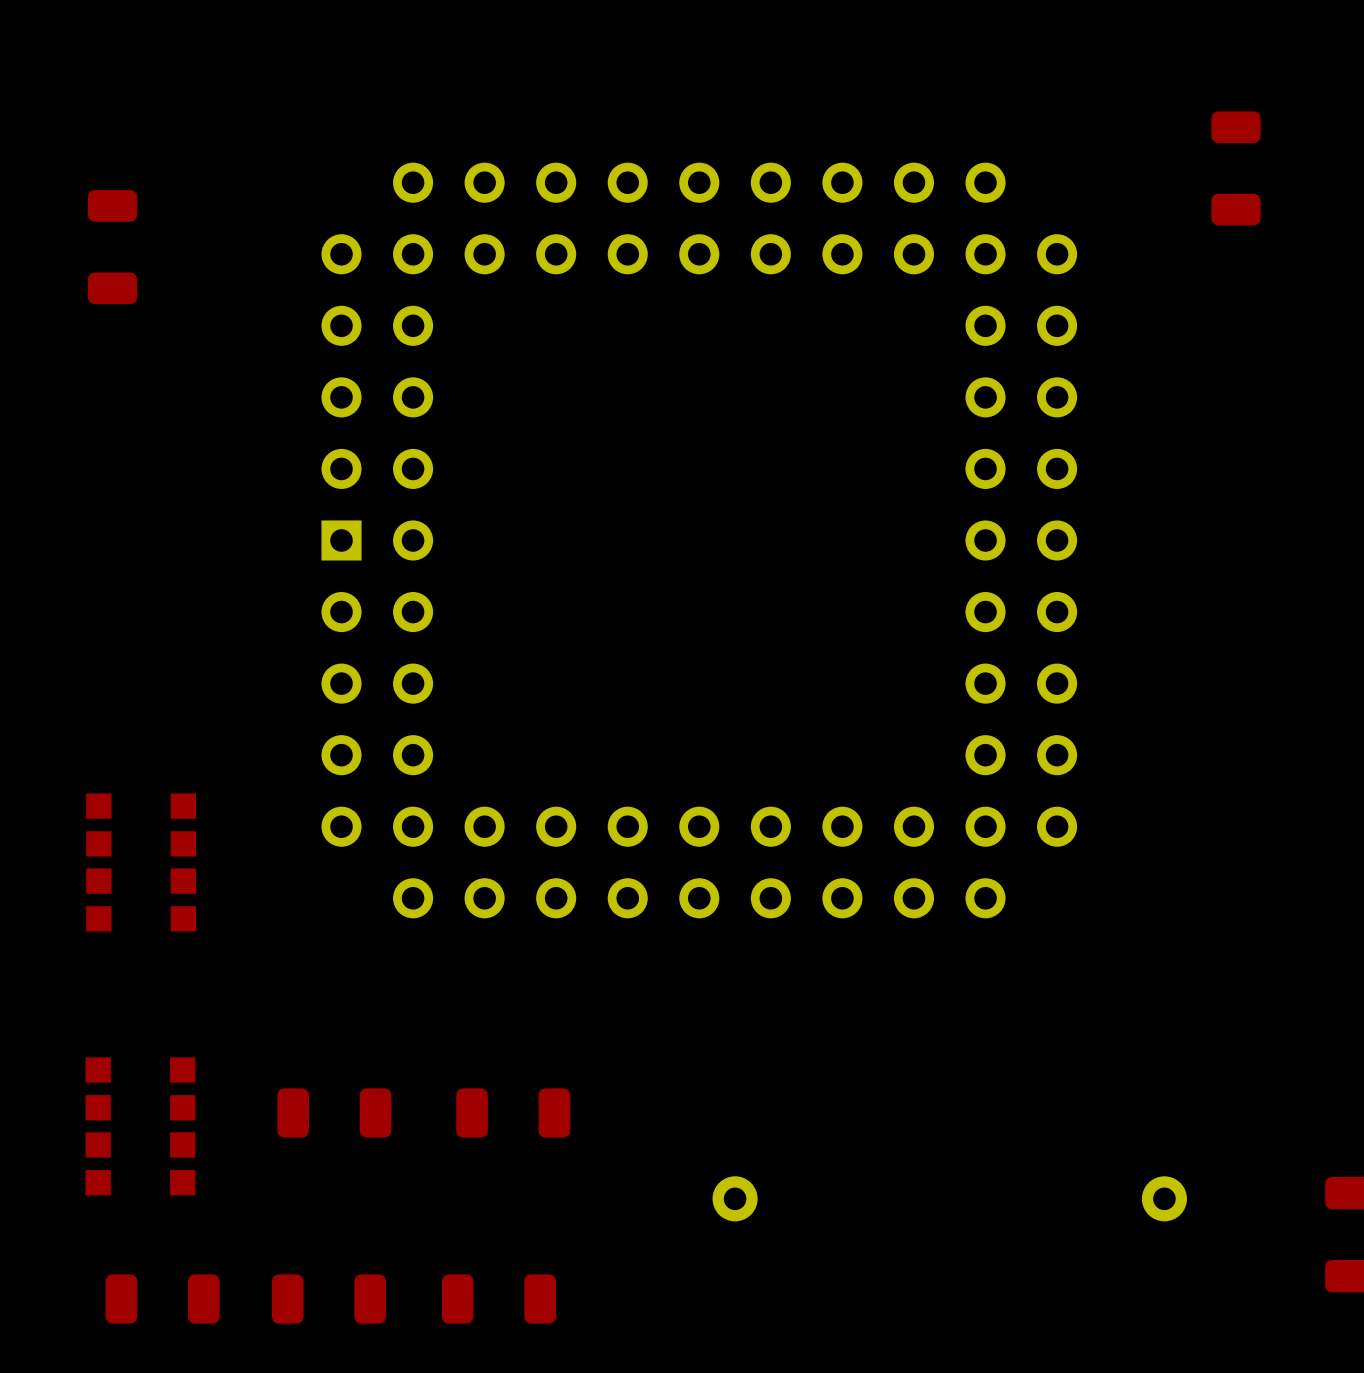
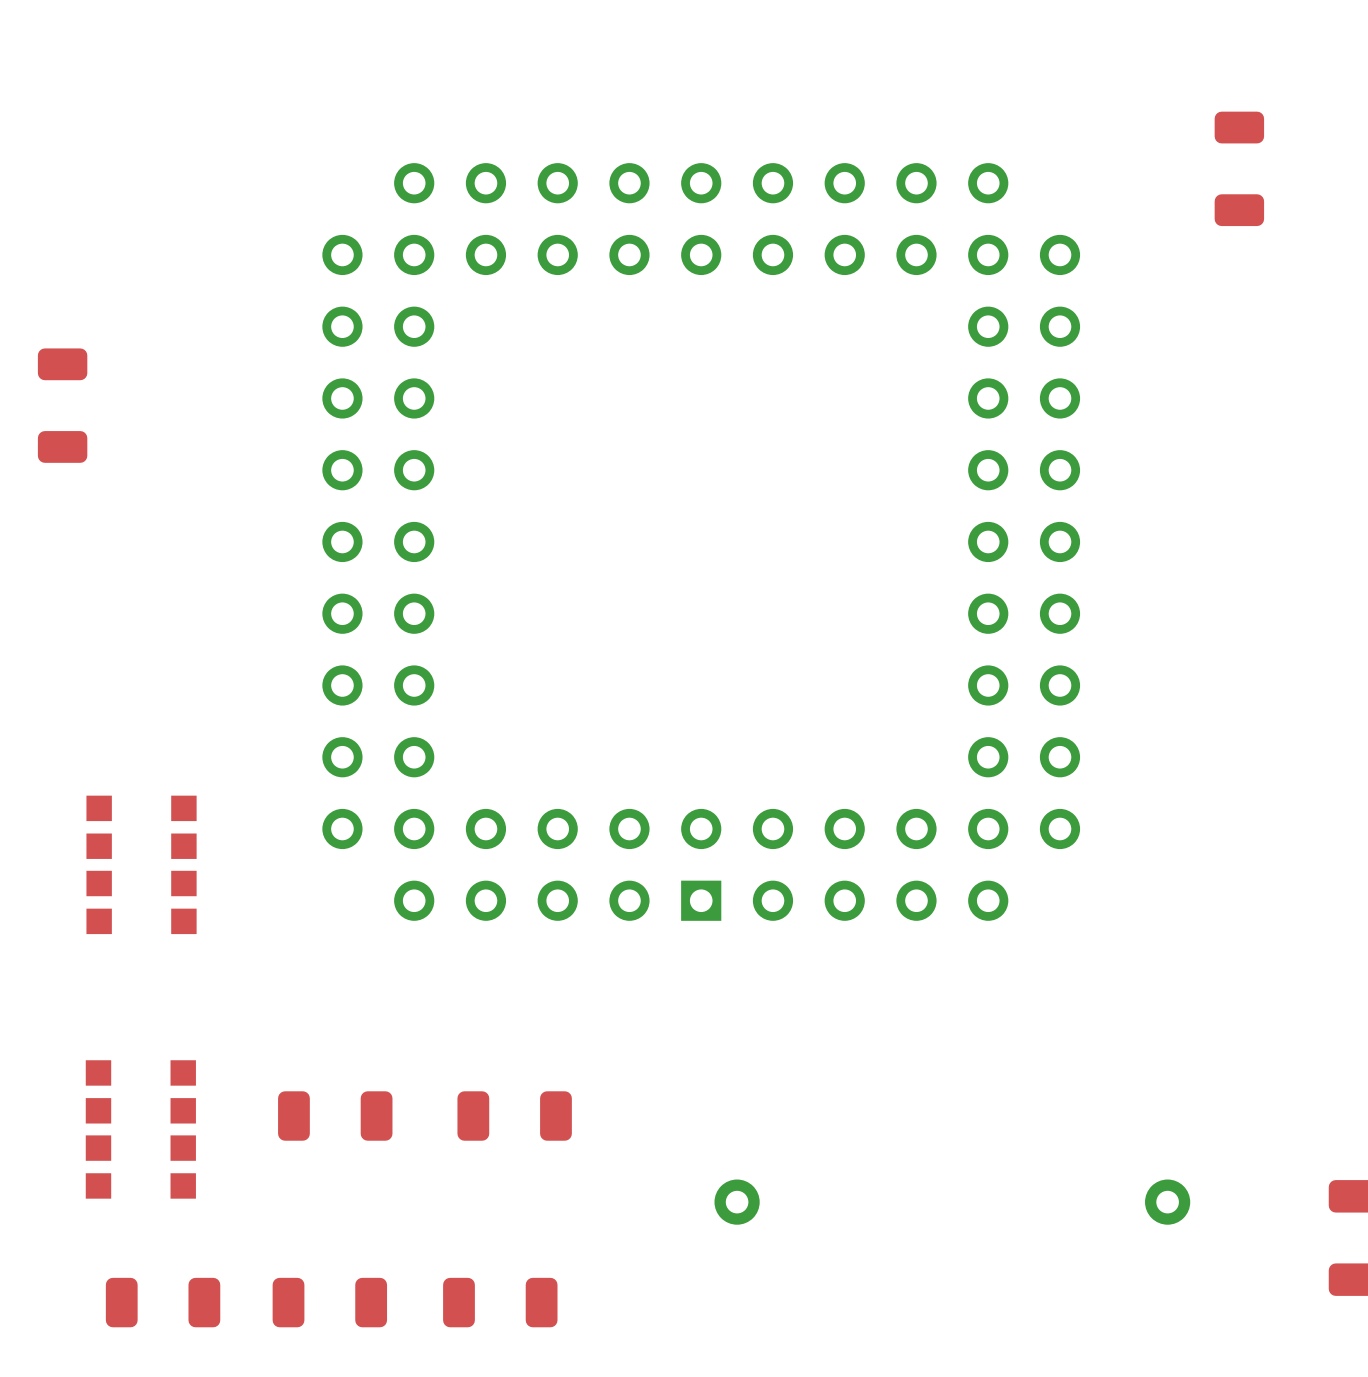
part position: (112, 247) -> (62, 405)
part rotation: 0° (699, 540) -> 90° counterclockwise (701, 541)

